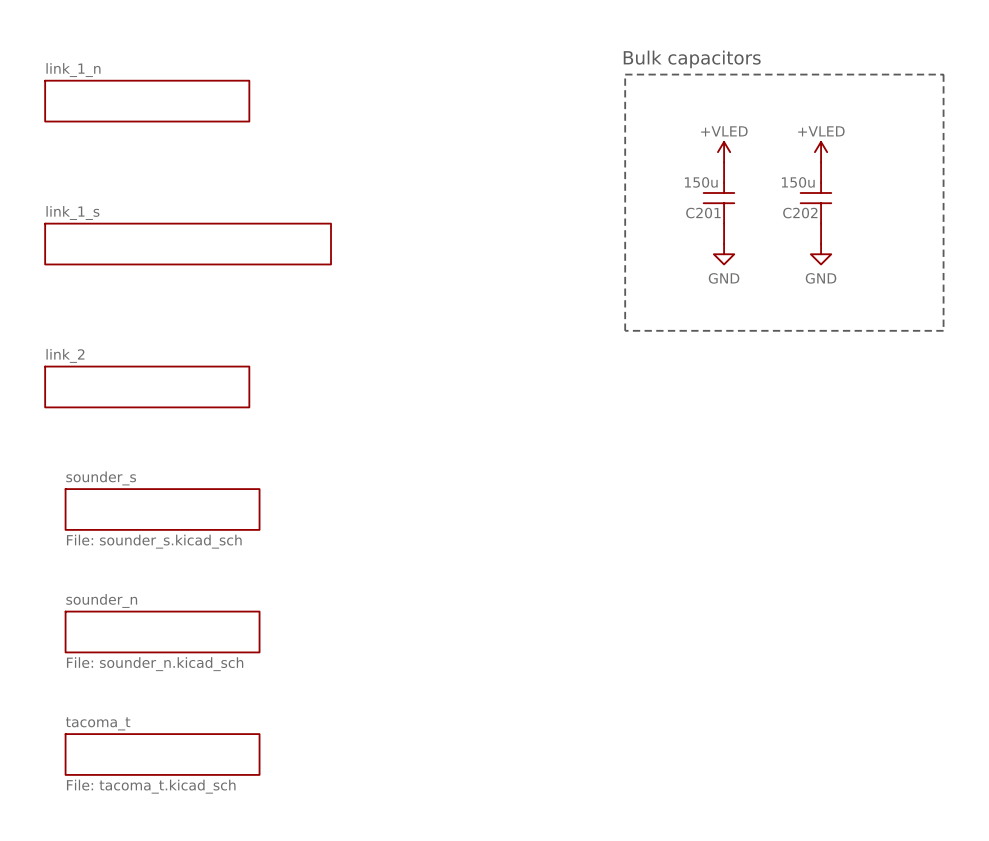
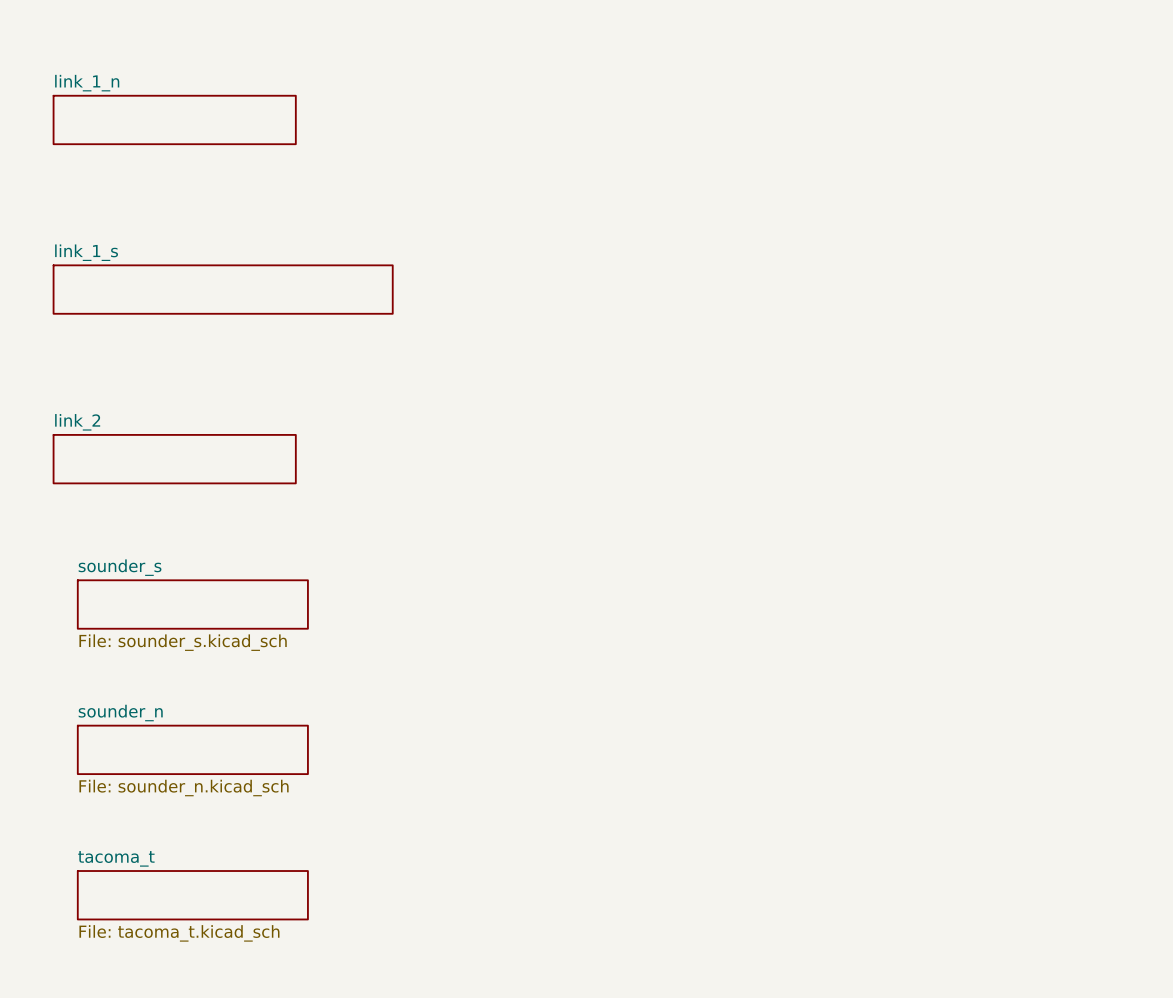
text: Bulk capacitors (692, 59) -> none
line: (625, 74) (943, 74) (943, 330) (625, 330) (625, 74) -> none
power symbol: +VLED (724, 152) -> none
power symbol: +VLED (821, 152) -> none
C201: 150u (718, 203) -> none
C202: 150u (815, 203) -> none
power symbol: GND (724, 254) -> none
power symbol: GND (821, 254) -> none

